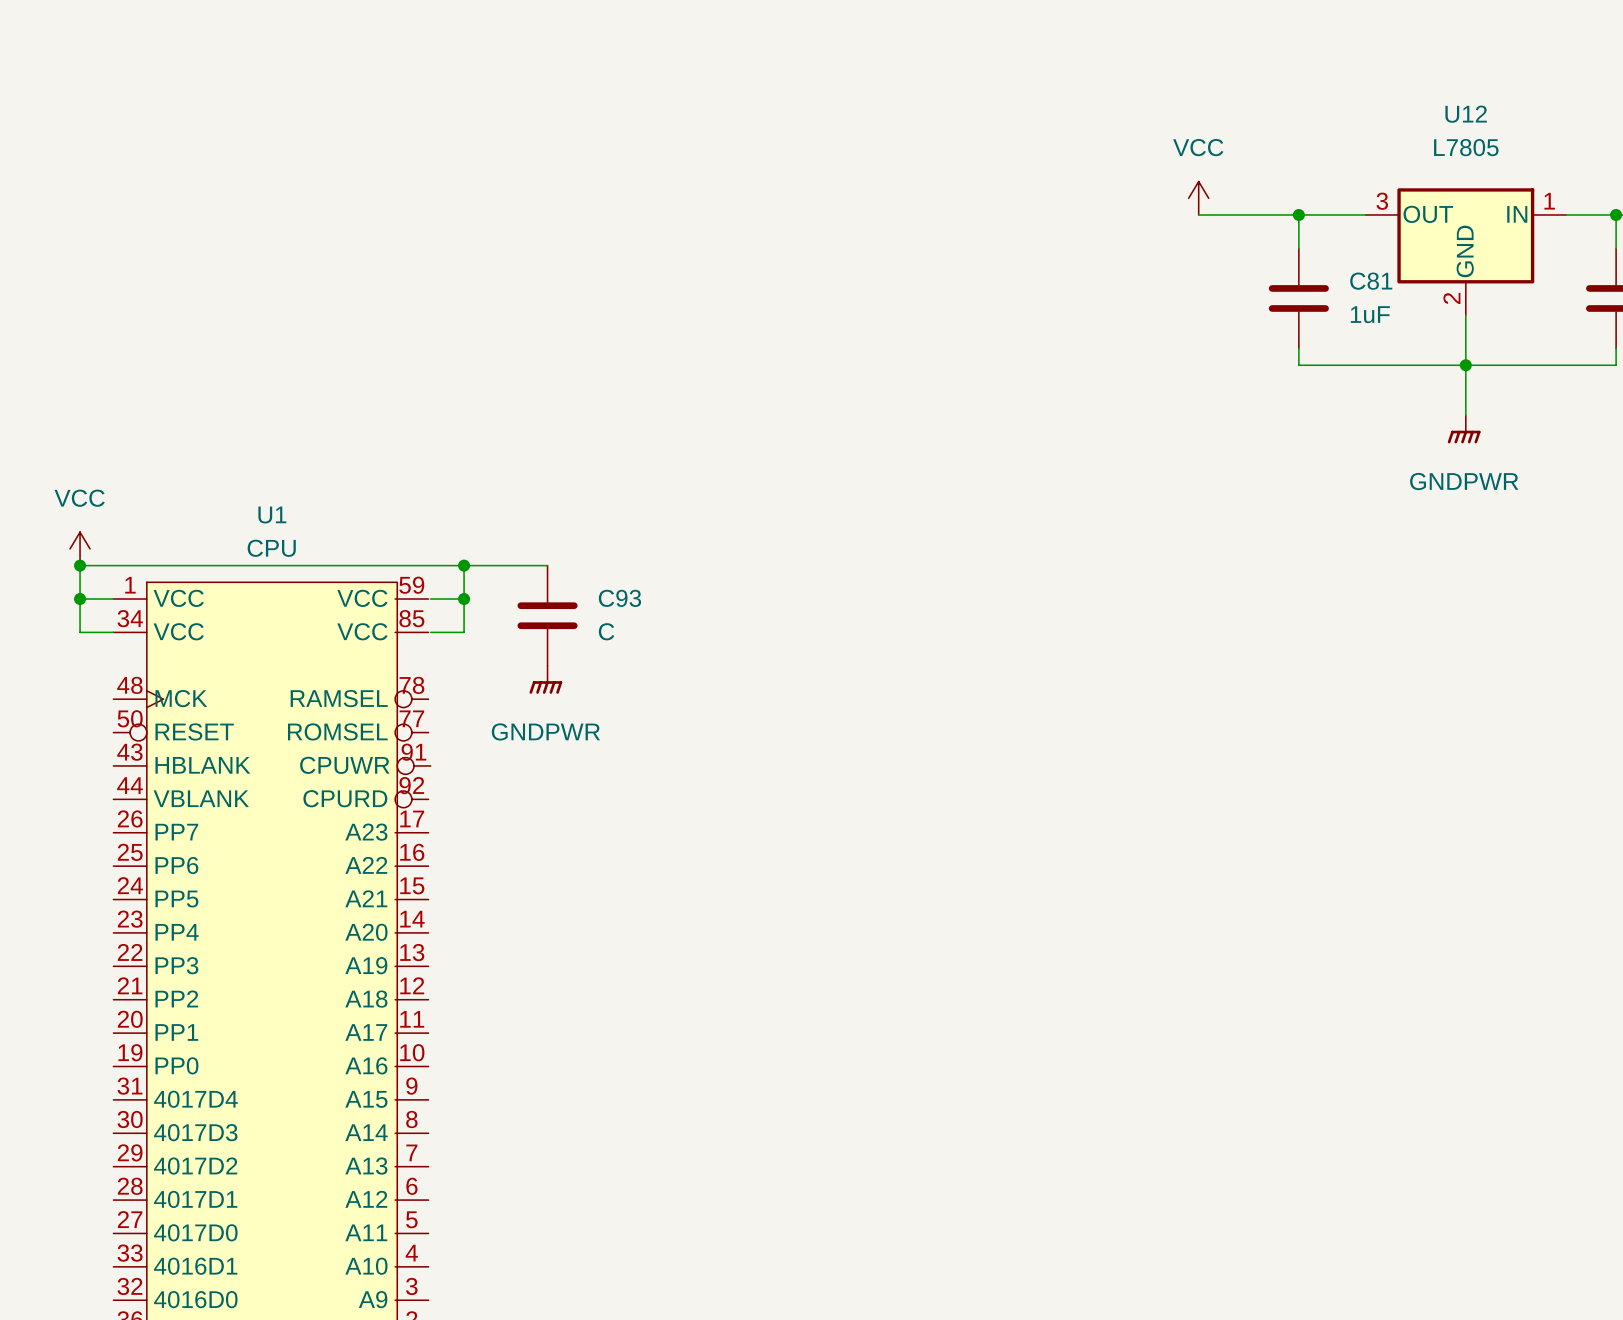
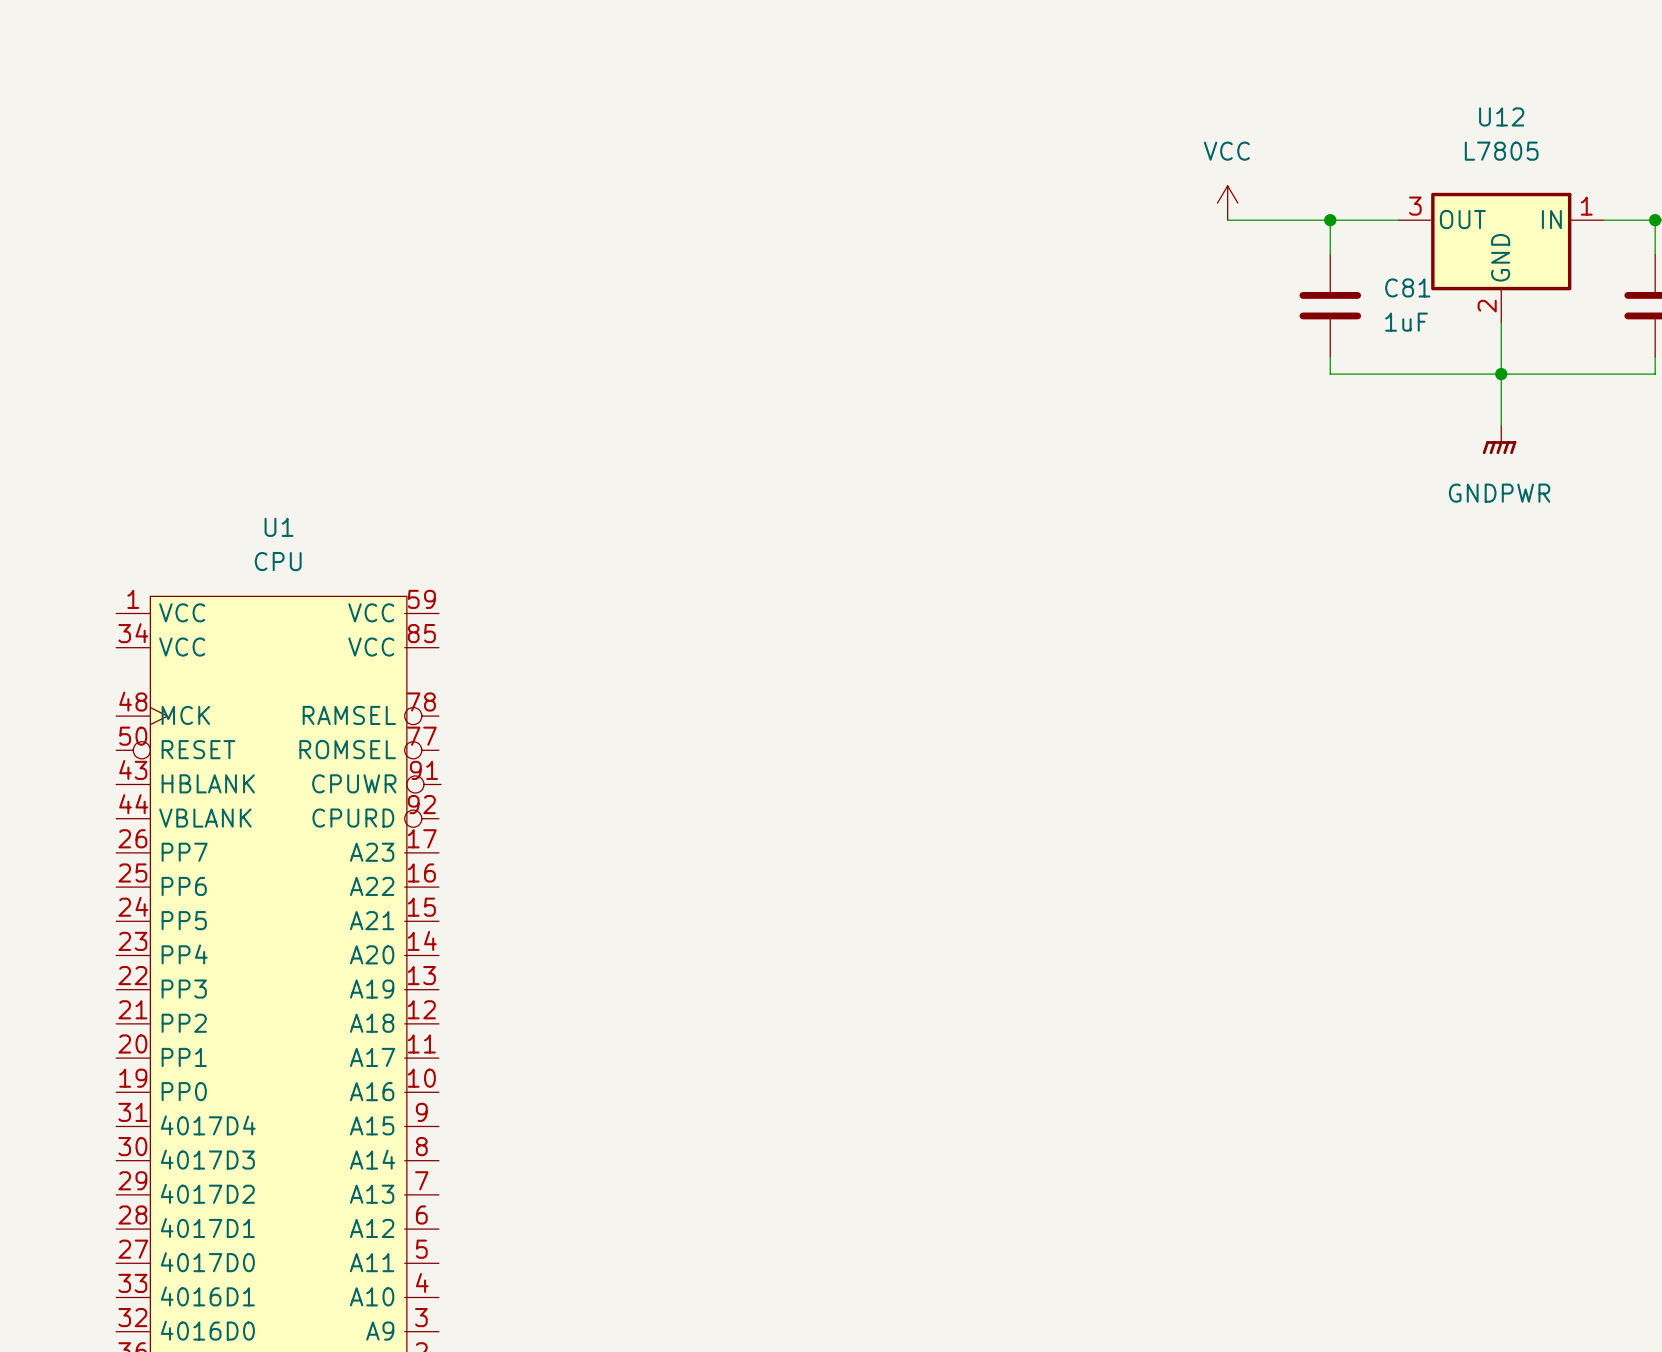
power symbol: VCC (80, 548) -> none
junction: (80, 565) -> none
wire: (464, 565) (464, 632) (430, 632) -> none
junction: (464, 565) -> none
wire: (547, 565) (80, 565) (80, 632) (113, 632) -> none
wire: (80, 599) (113, 599) -> none
junction: (80, 599) -> none
wire: (430, 599) (464, 599) -> none
junction: (464, 599) -> none
C93: C (547, 615) -> none
power symbol: GNDPWR (545, 679) -> none

